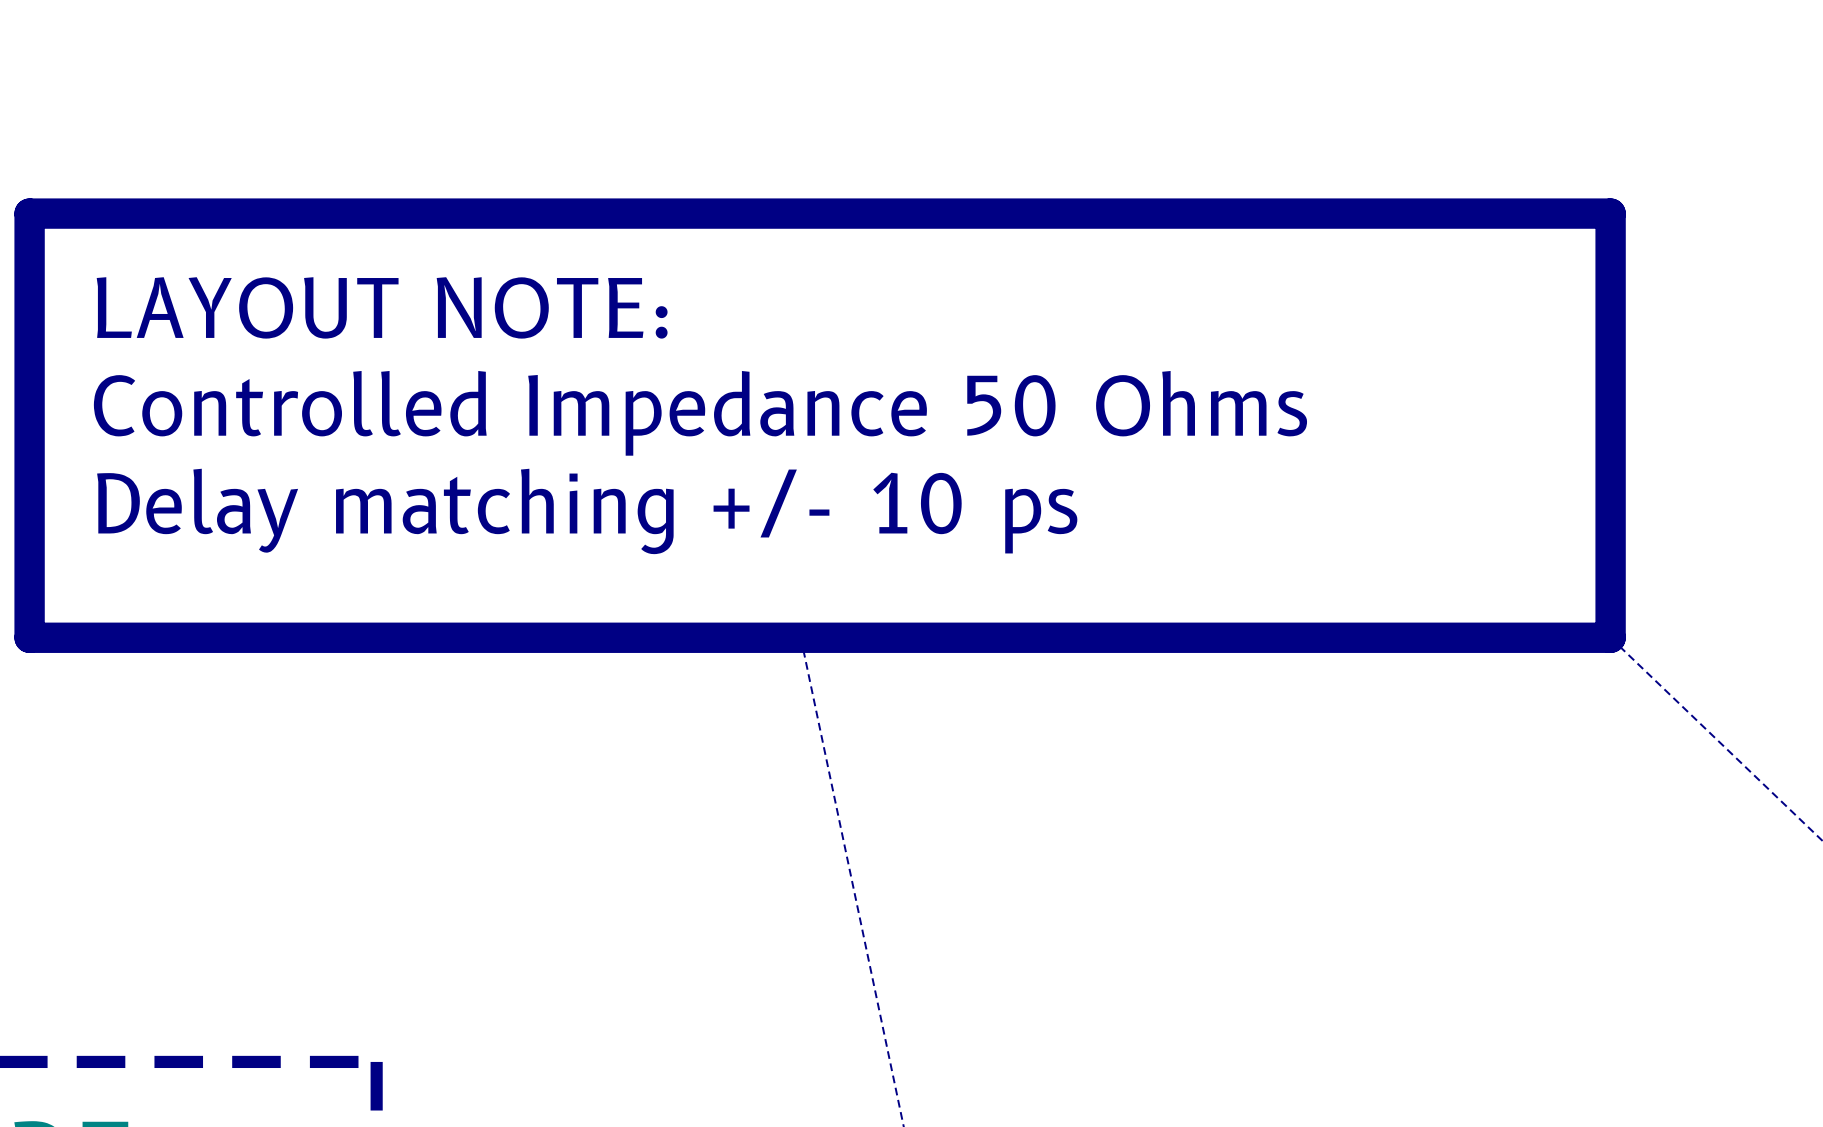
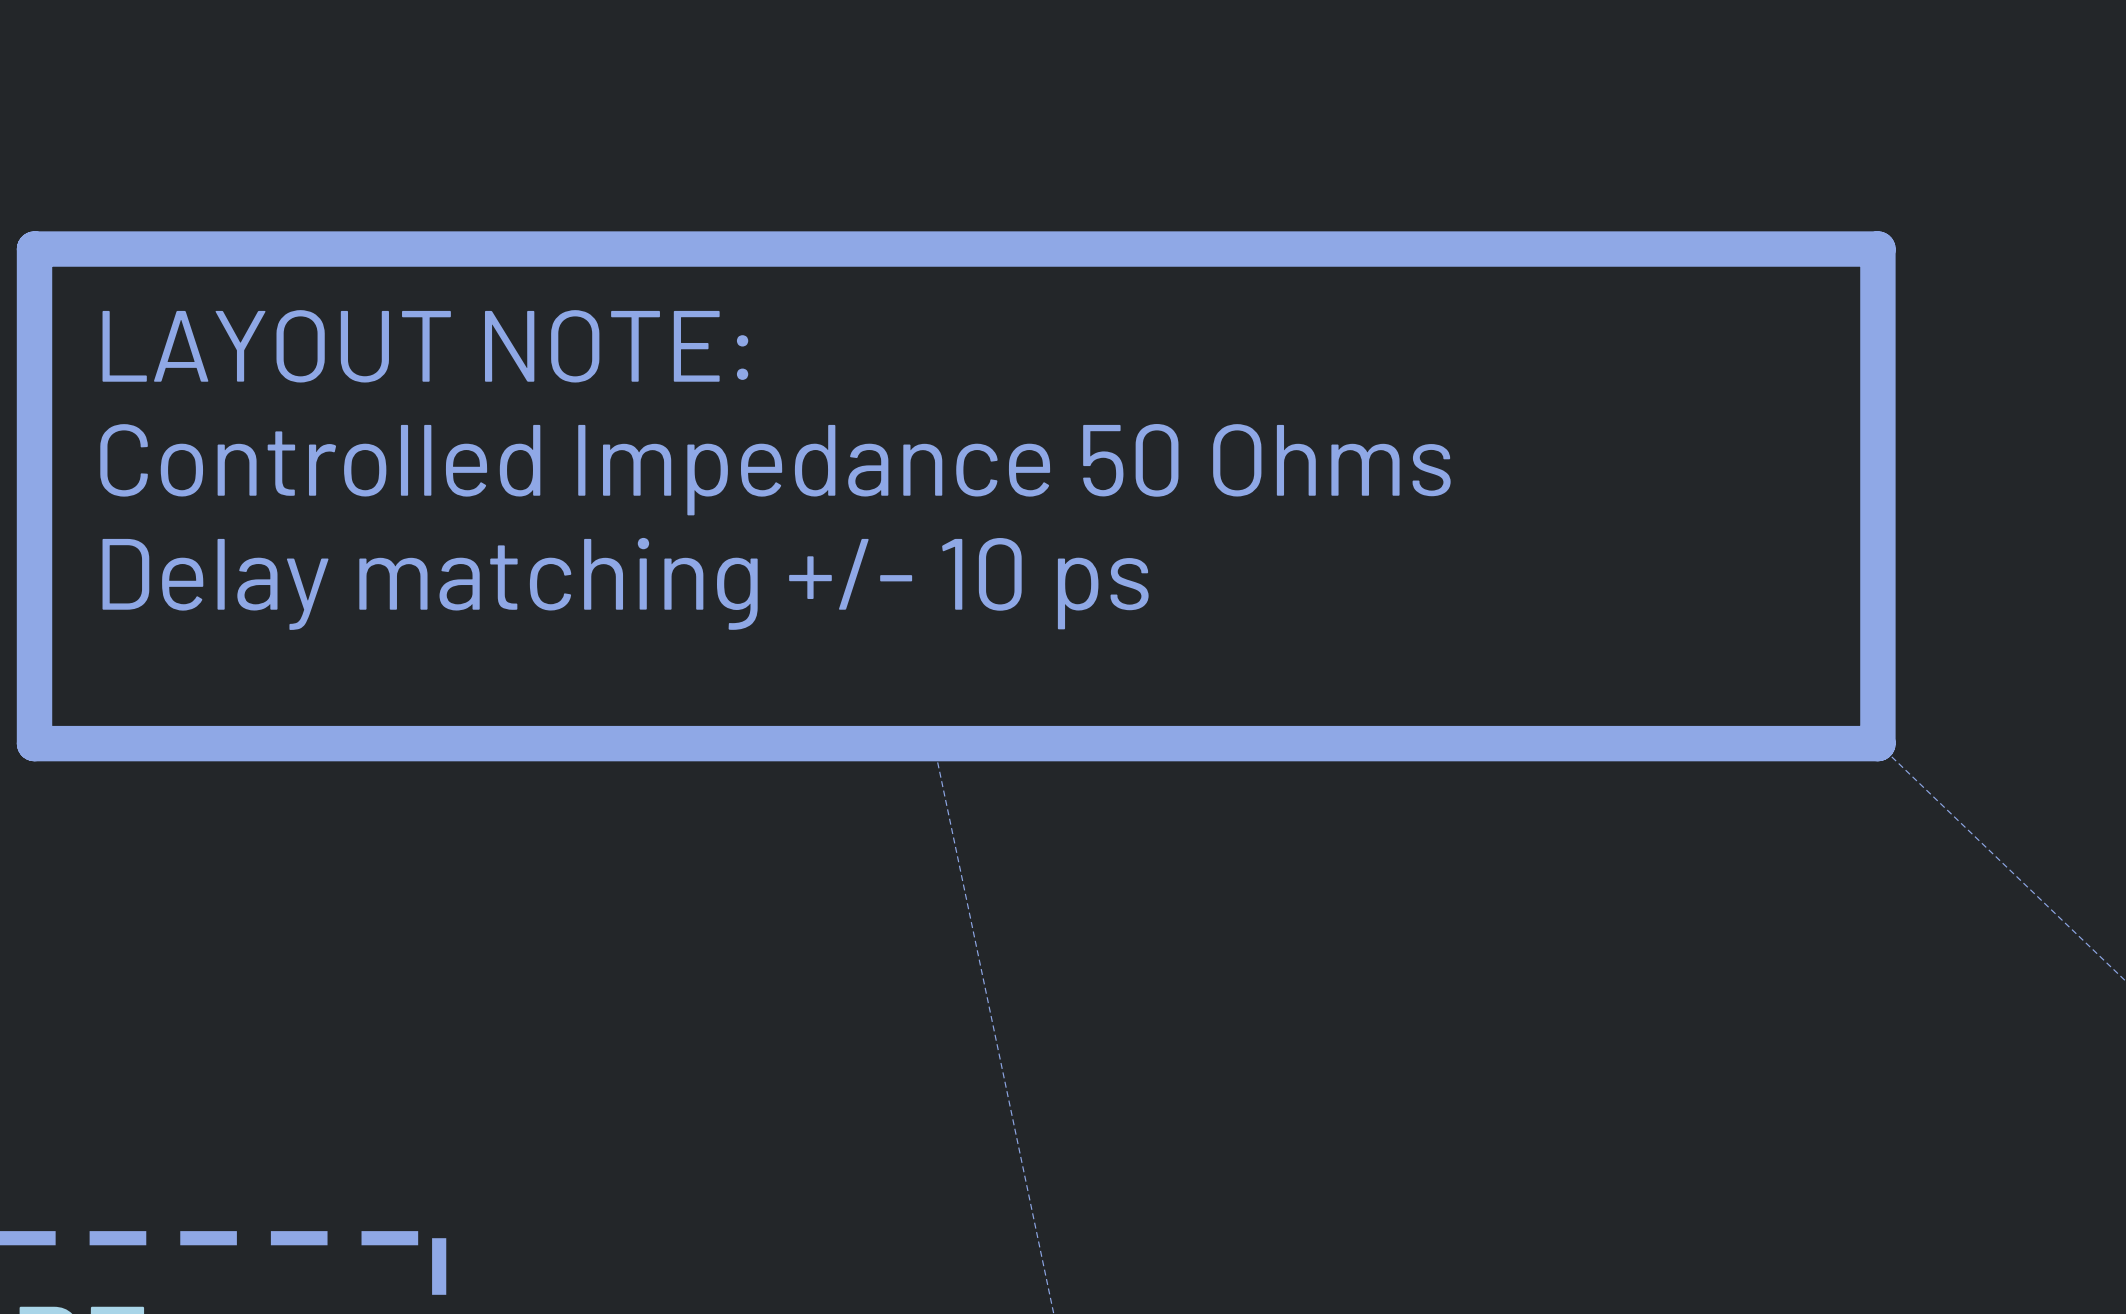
text position: LAYOUT NOTE: (382, 307) -> LAYOUT NOTE: (425, 346)
text position: Controlled Impedance 50 Ohms (700, 413) -> Controlled Impedance 50 Ohms (775, 469)
text position: Delay matching +/- 10 ps (587, 511) -> Delay matching +/- 10 ps (625, 583)

